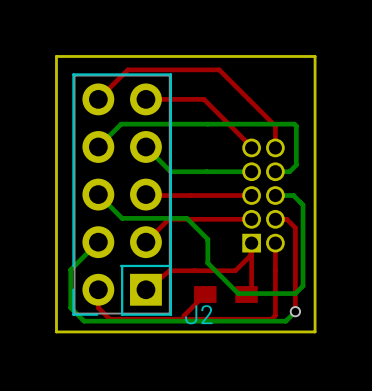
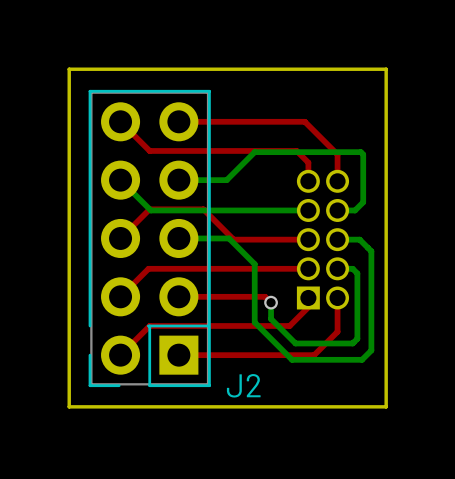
top track: (204, 99) (251, 146) -> (250, 121) (304, 121)
top track: (248, 99) (219, 69) (127, 69) (98, 99) -> (308, 180) (308, 162) (296, 150) (149, 150) (120, 121)
bottom track: (207, 124) (121, 124) (98, 146) -> (254, 152) (226, 180) (178, 180)
bottom track: (145, 146) (170, 171) -> (120, 180) (150, 210) (209, 210)
bottom track: (98, 194) (122, 218) (186, 218) (207, 239) -> (178, 238) (229, 238) (254, 264) (254, 293)
top track: (145, 194) (190, 195) -> (120, 238) (149, 209) (203, 209) (233, 239)
top track: (168, 219) (145, 242) -> (206, 268) (148, 268) (120, 296)
top track: (275, 219) (286, 219) (295, 227) (295, 311) -> none
bottom track: none -> (337, 268) (352, 268) (357, 273) (357, 338) (352, 343) (295, 343) (271, 318) (271, 302)
bottom track: (98, 242) (70, 269) (70, 307) (84, 321) (285, 321) (295, 311) -> none
top track: none -> (178, 296) (265, 296) (271, 302)
top track: (251, 243) (250, 255) (235, 270) (169, 270) (145, 289) -> (337, 331) (314, 355) (178, 355)
top track: (251, 250) (251, 289) (246, 294) -> none
top track: (275, 270) (275, 315) (271, 319) (109, 319) (98, 307) (98, 289) -> (308, 307) (289, 325) (149, 325) (120, 355)
top track: (205, 294) (184, 315) (184, 319) -> none
part: (225, 294) -> none
via position: (295, 311) -> (271, 302)

